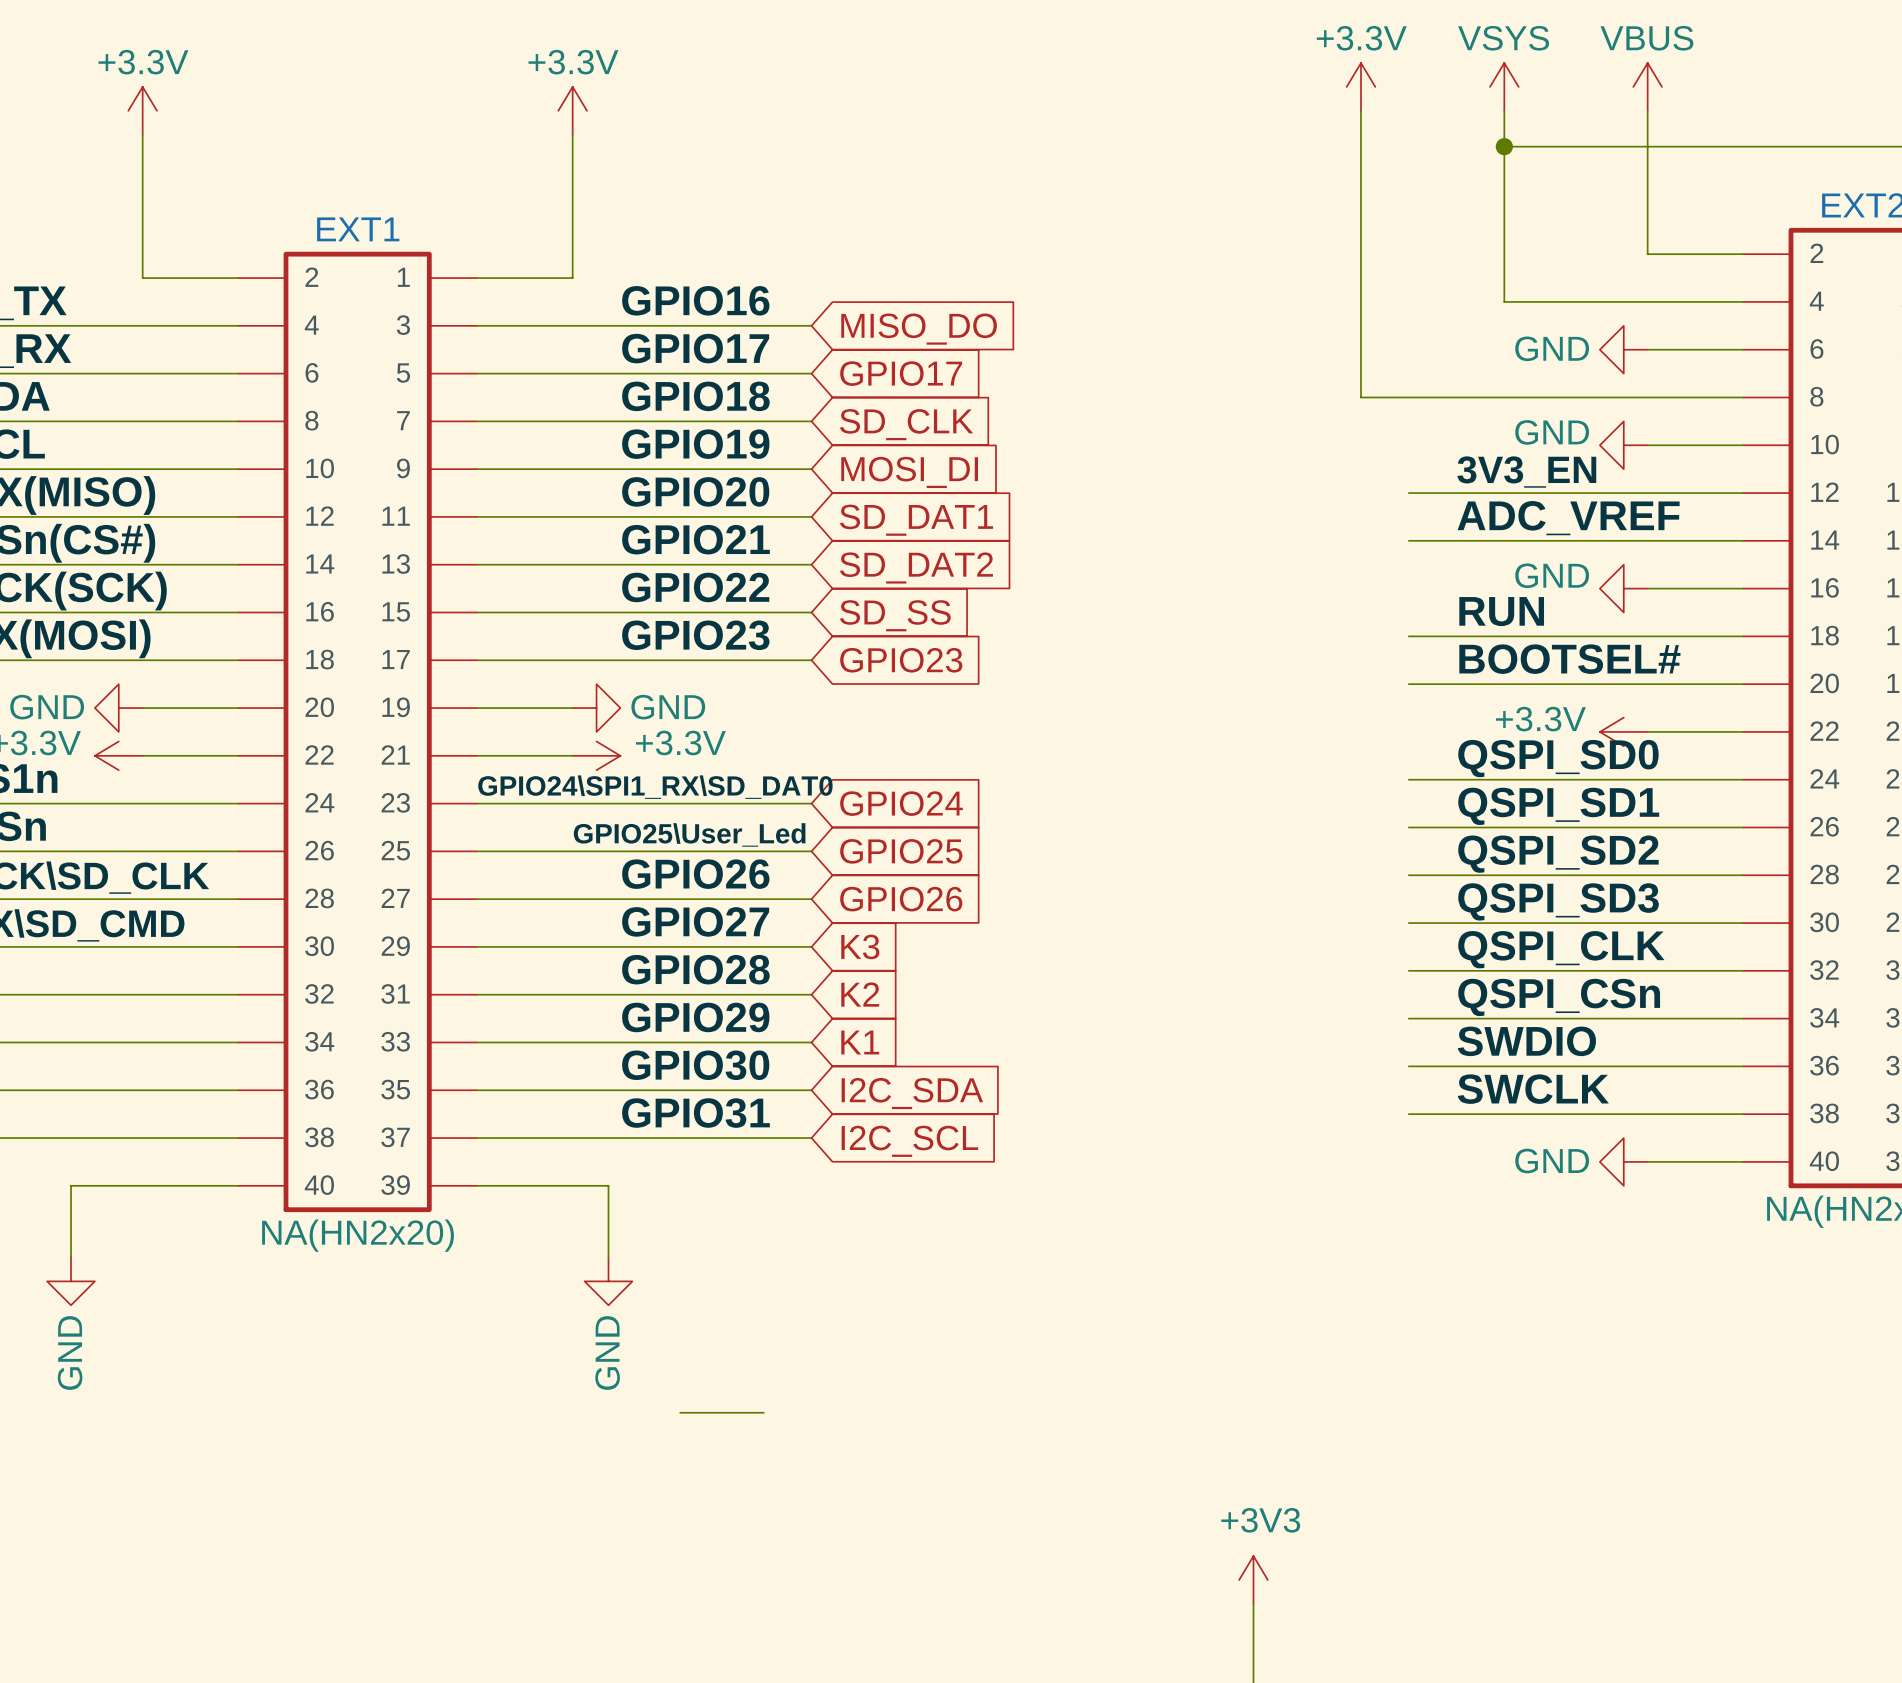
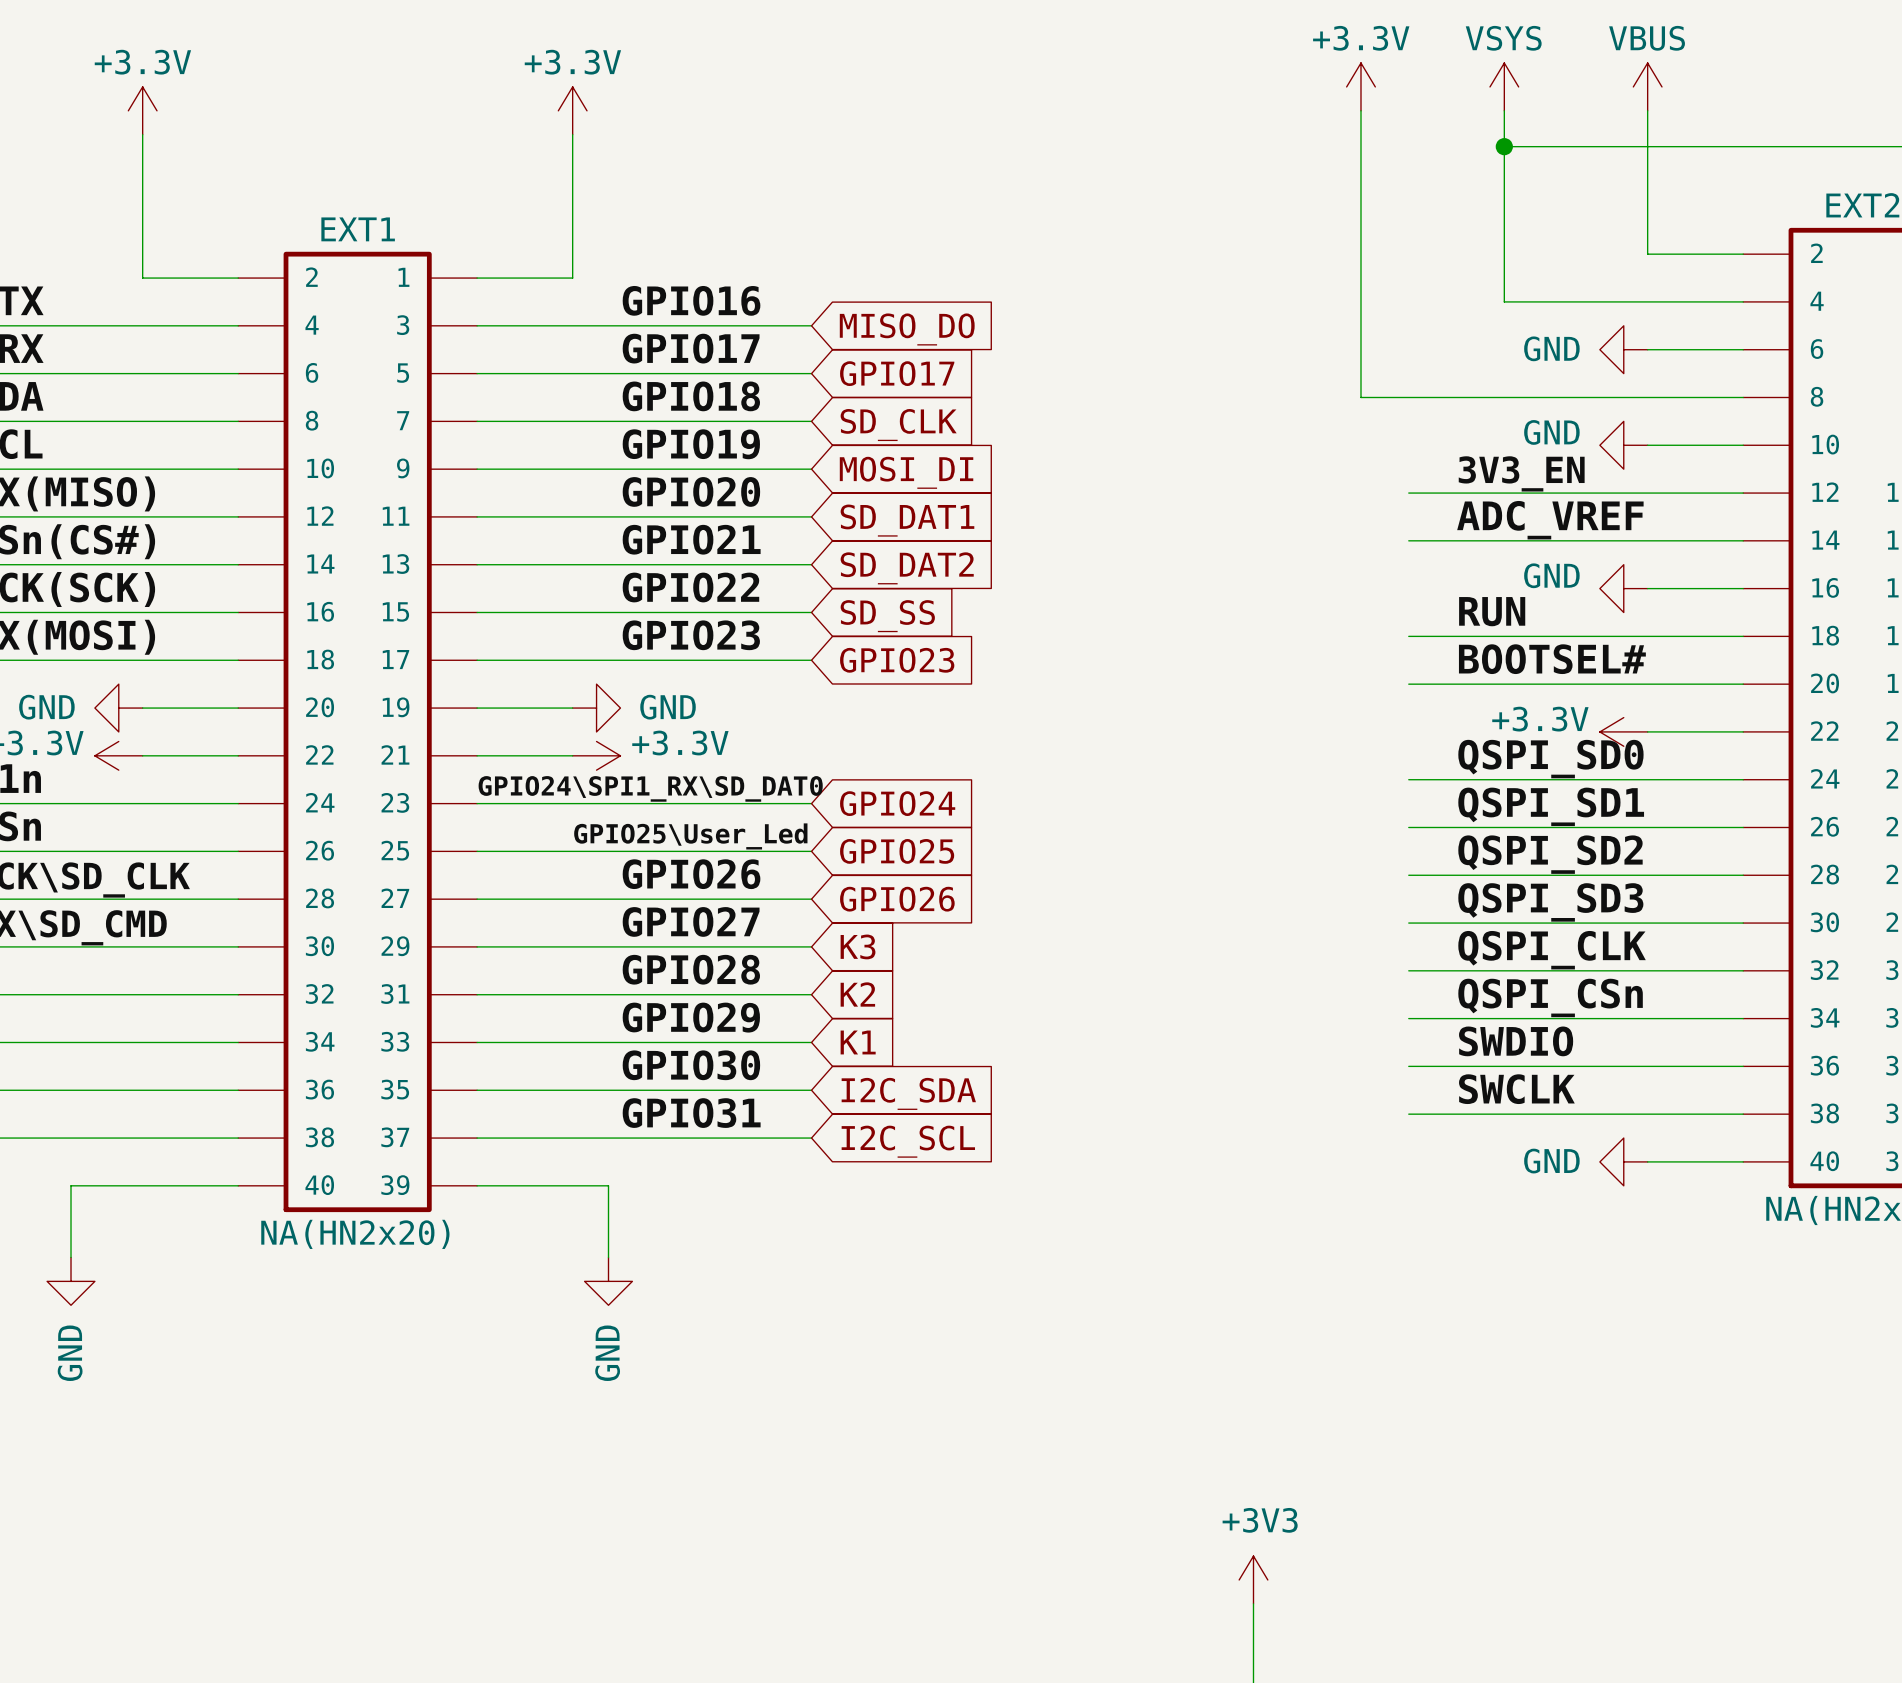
wire: (680, 1412) (763, 1412) -> none

